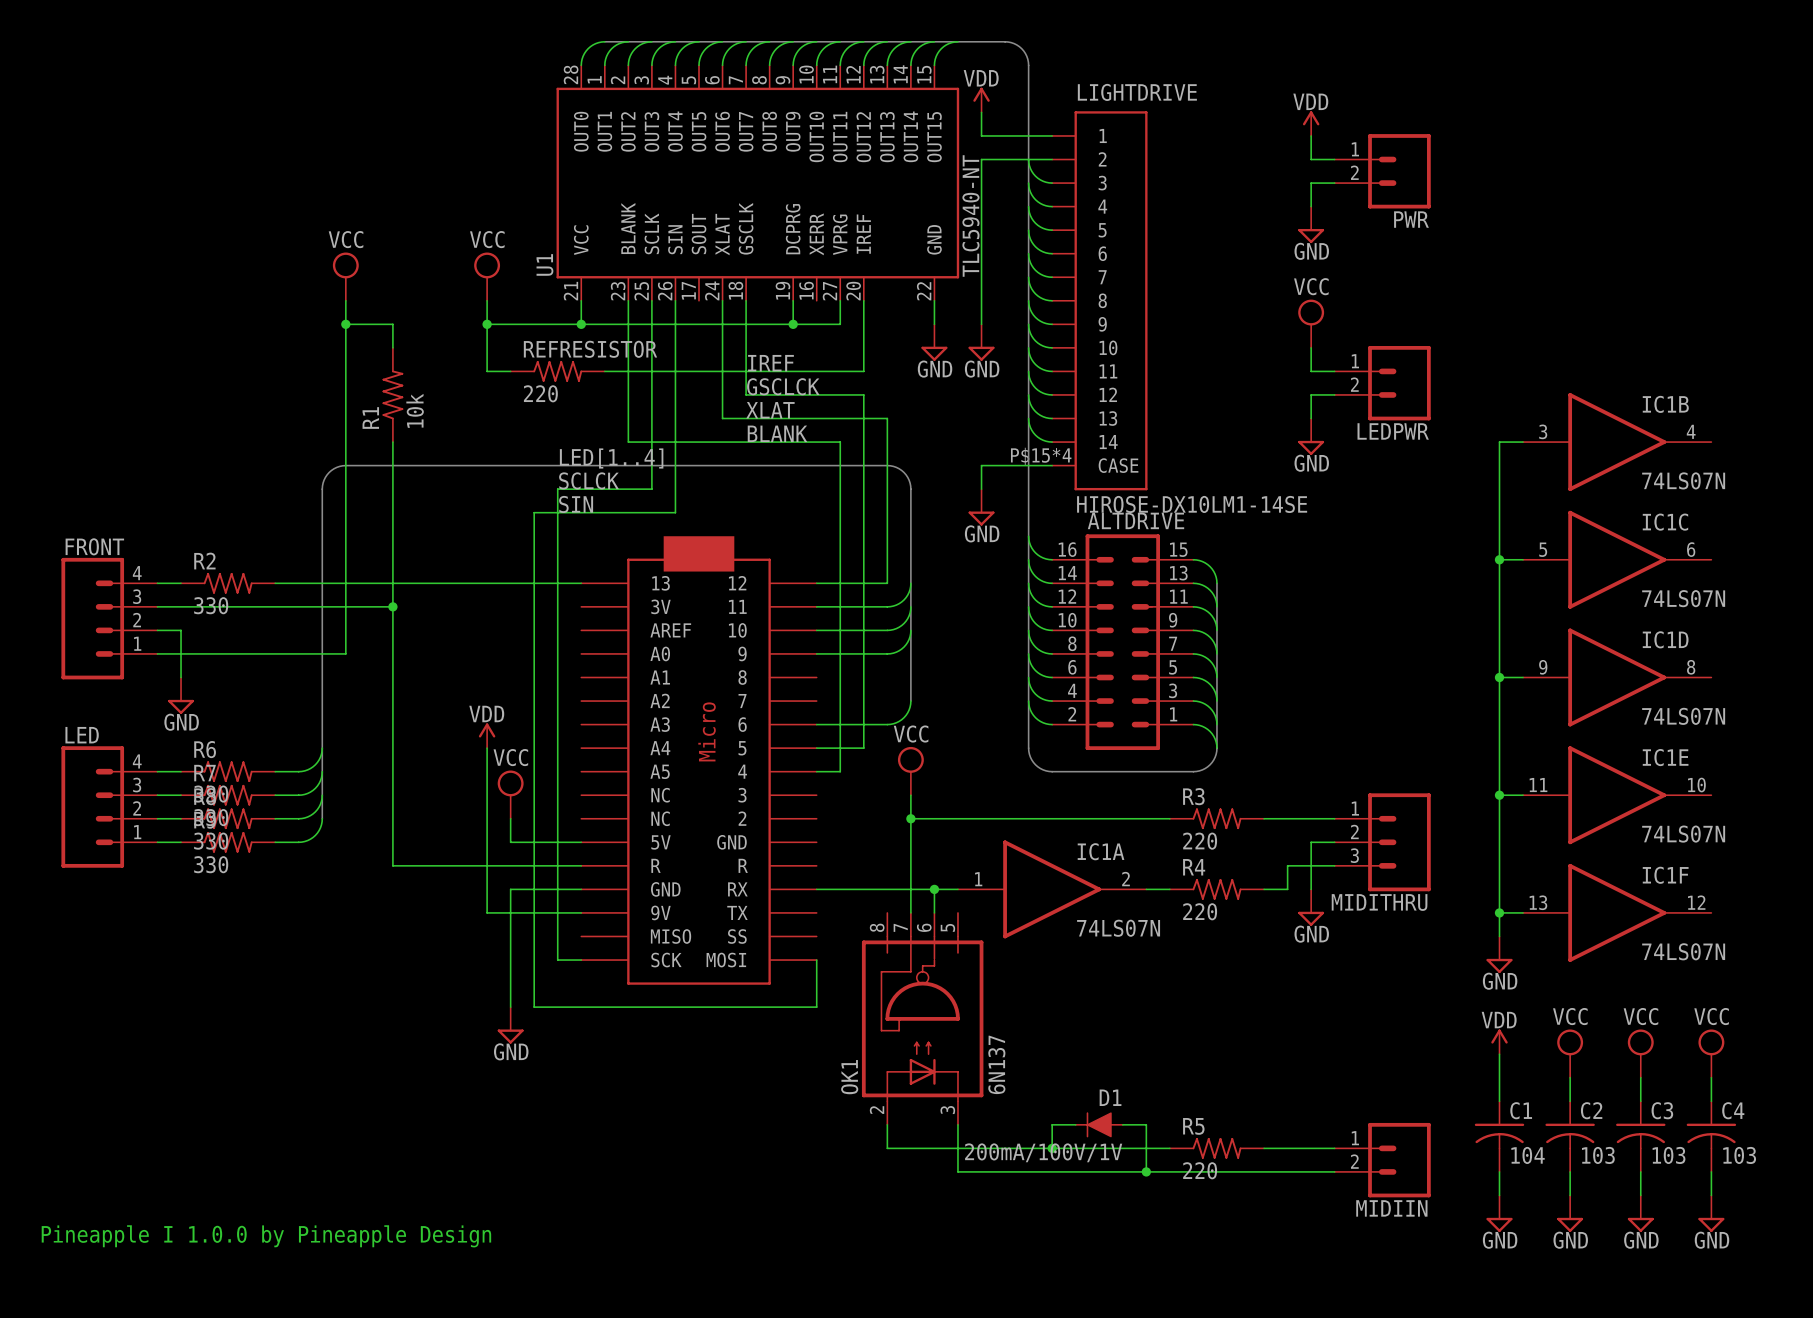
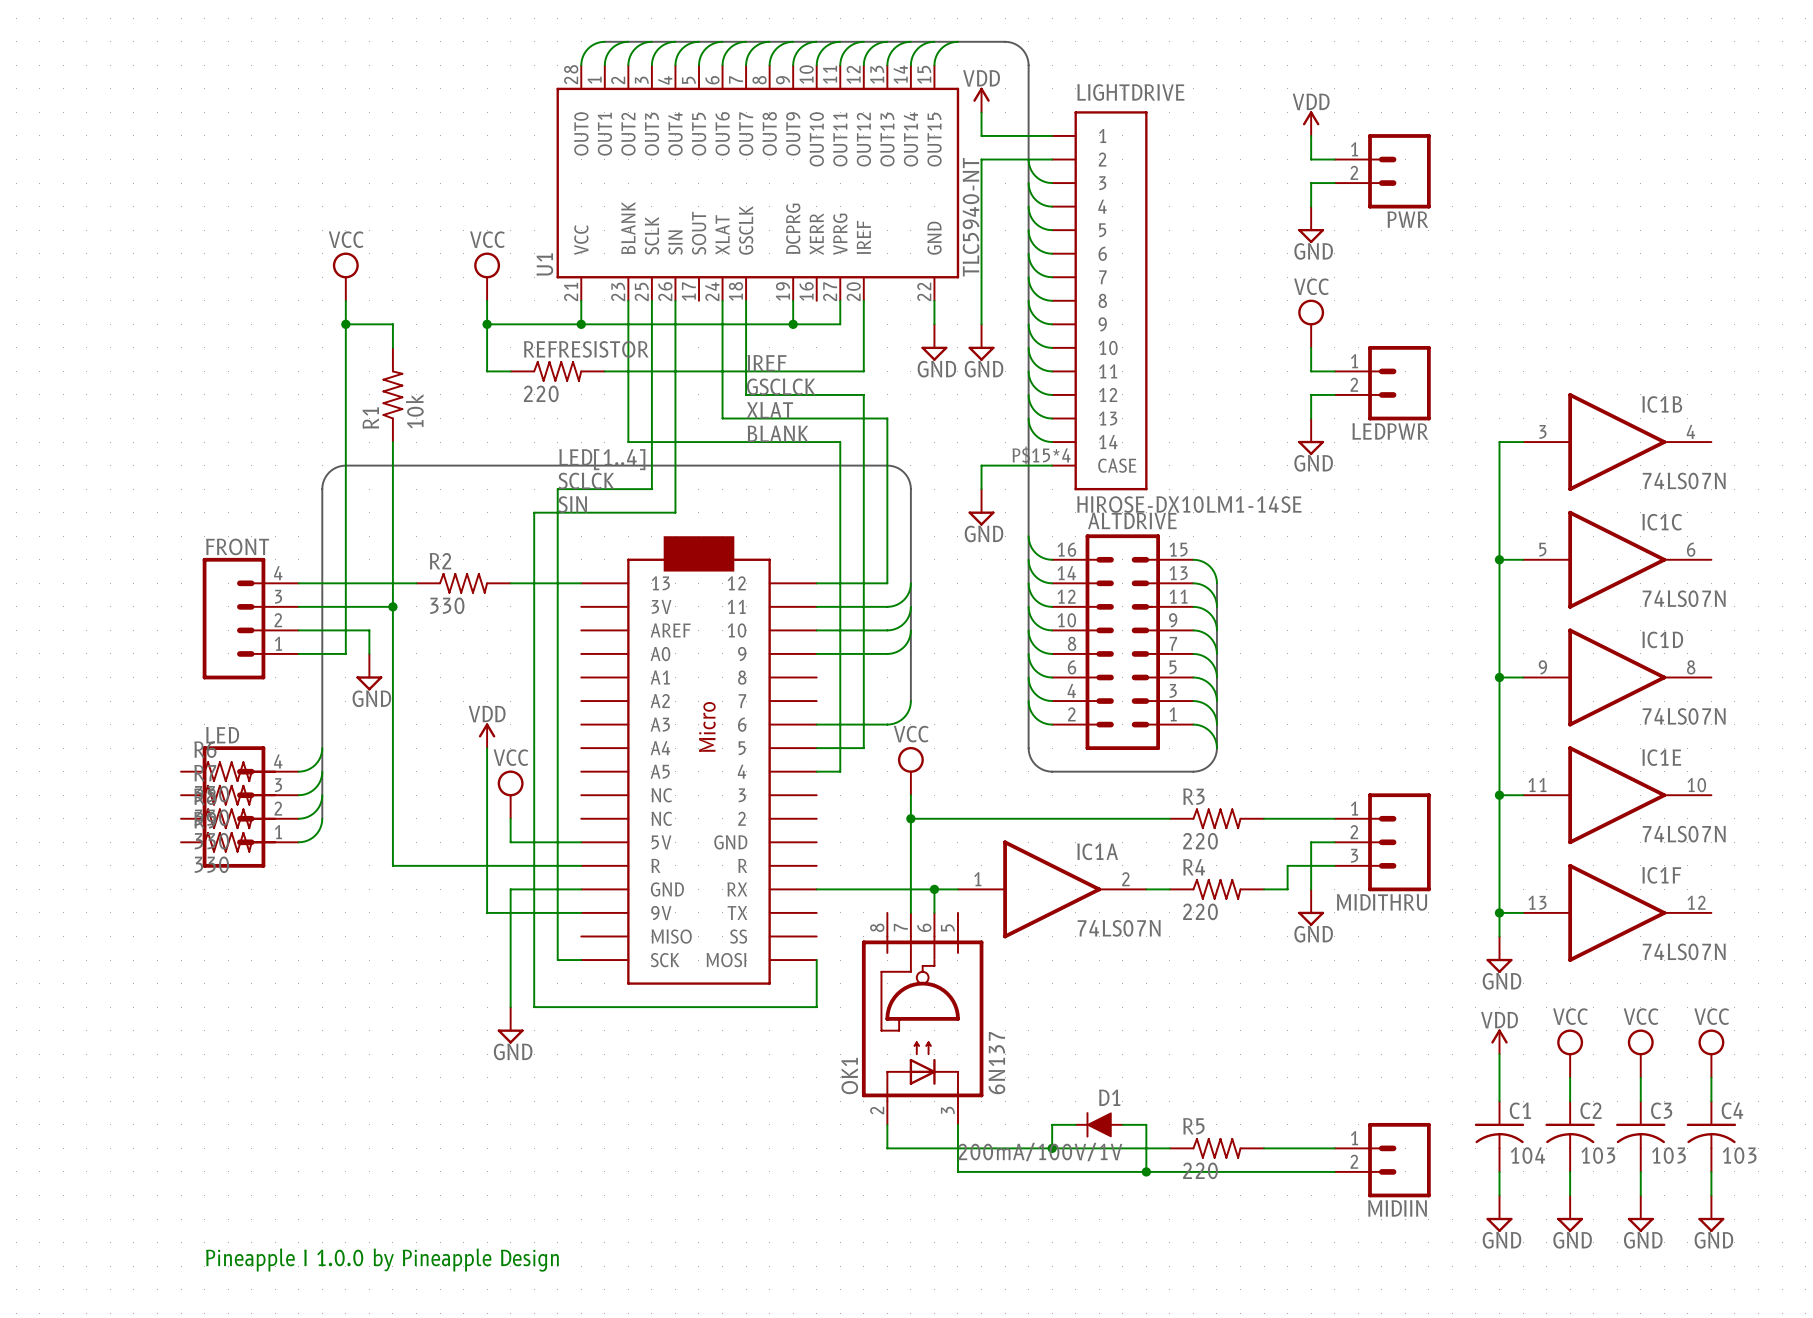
wire: (157, 583) (181, 583) -> none
R2 position: (228, 583) -> (463, 583)
wire: (157, 606) (298, 606) -> none
FRONT position: (109, 618) -> (250, 618)
wire: (157, 630) (181, 630) (181, 677) -> none
wire: none -> (298, 630) (369, 630) (369, 653)
wire: (157, 653) (298, 653) -> none
power symbol position: GND (181, 695) -> GND (369, 672)
wire: (157, 771) (181, 771) -> none
wire: (157, 795) (181, 795) -> none
LED position: (109, 806) -> (250, 806)
wire: (157, 818) (181, 818) -> none
wire: (157, 842) (181, 842) -> none
text position: Pineapple I 1.0.0 by Pineapple Design (266, 1236) -> Pineapple I 1.0.0 by Pineapple Design (382, 1260)

